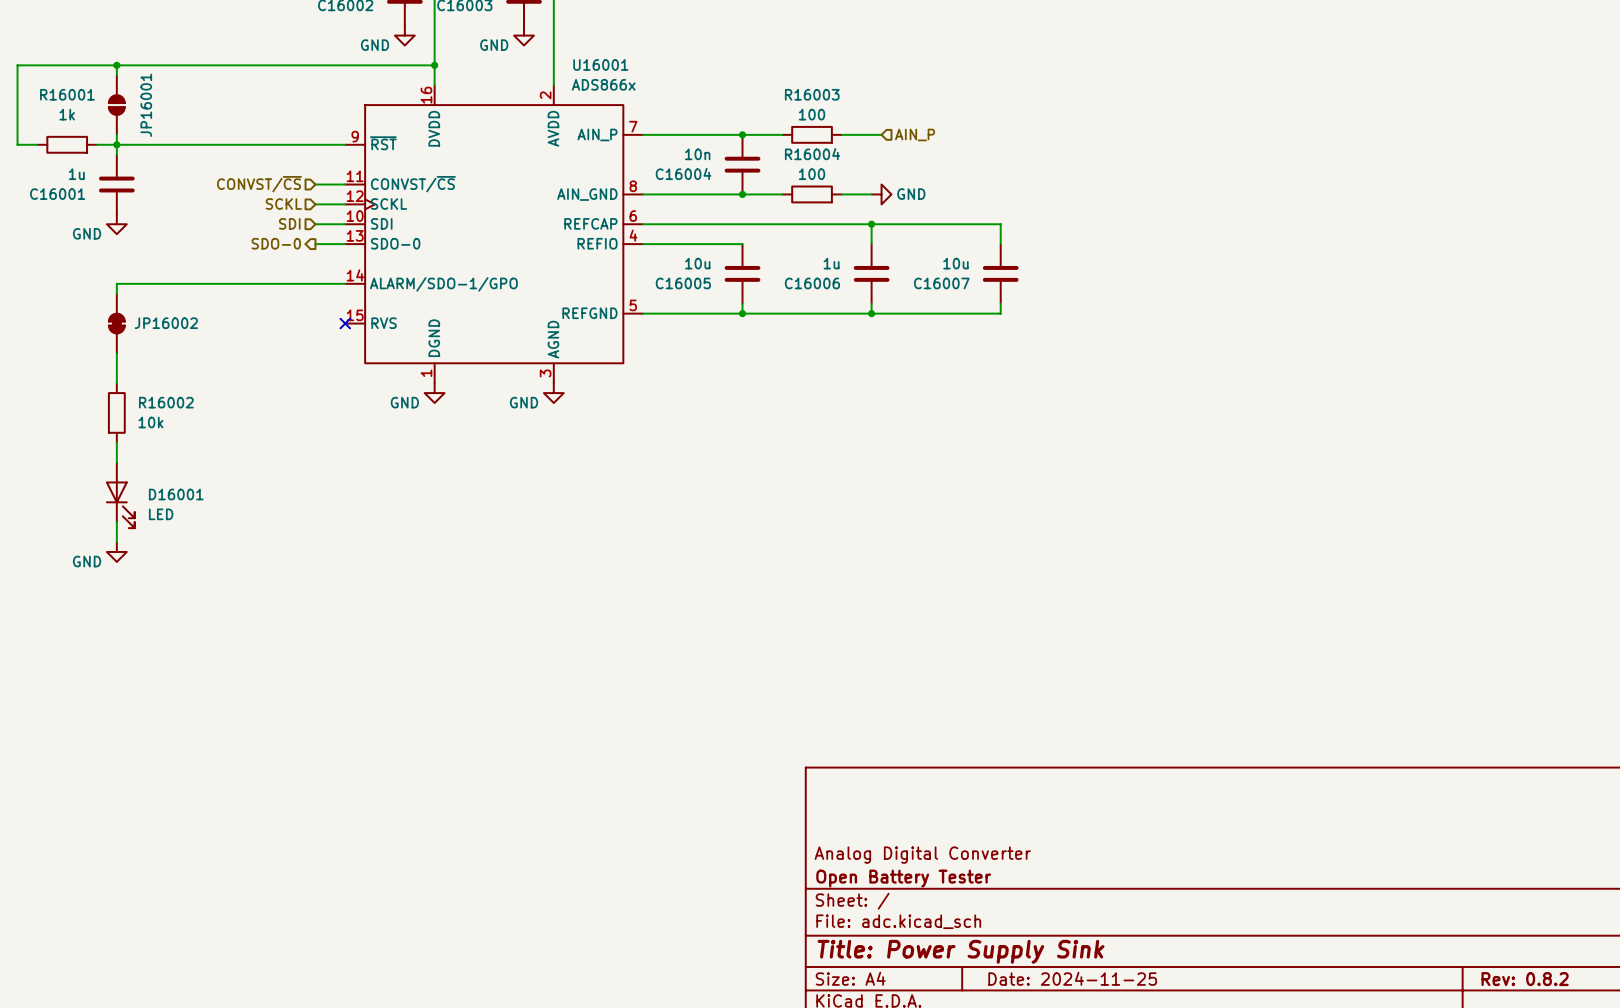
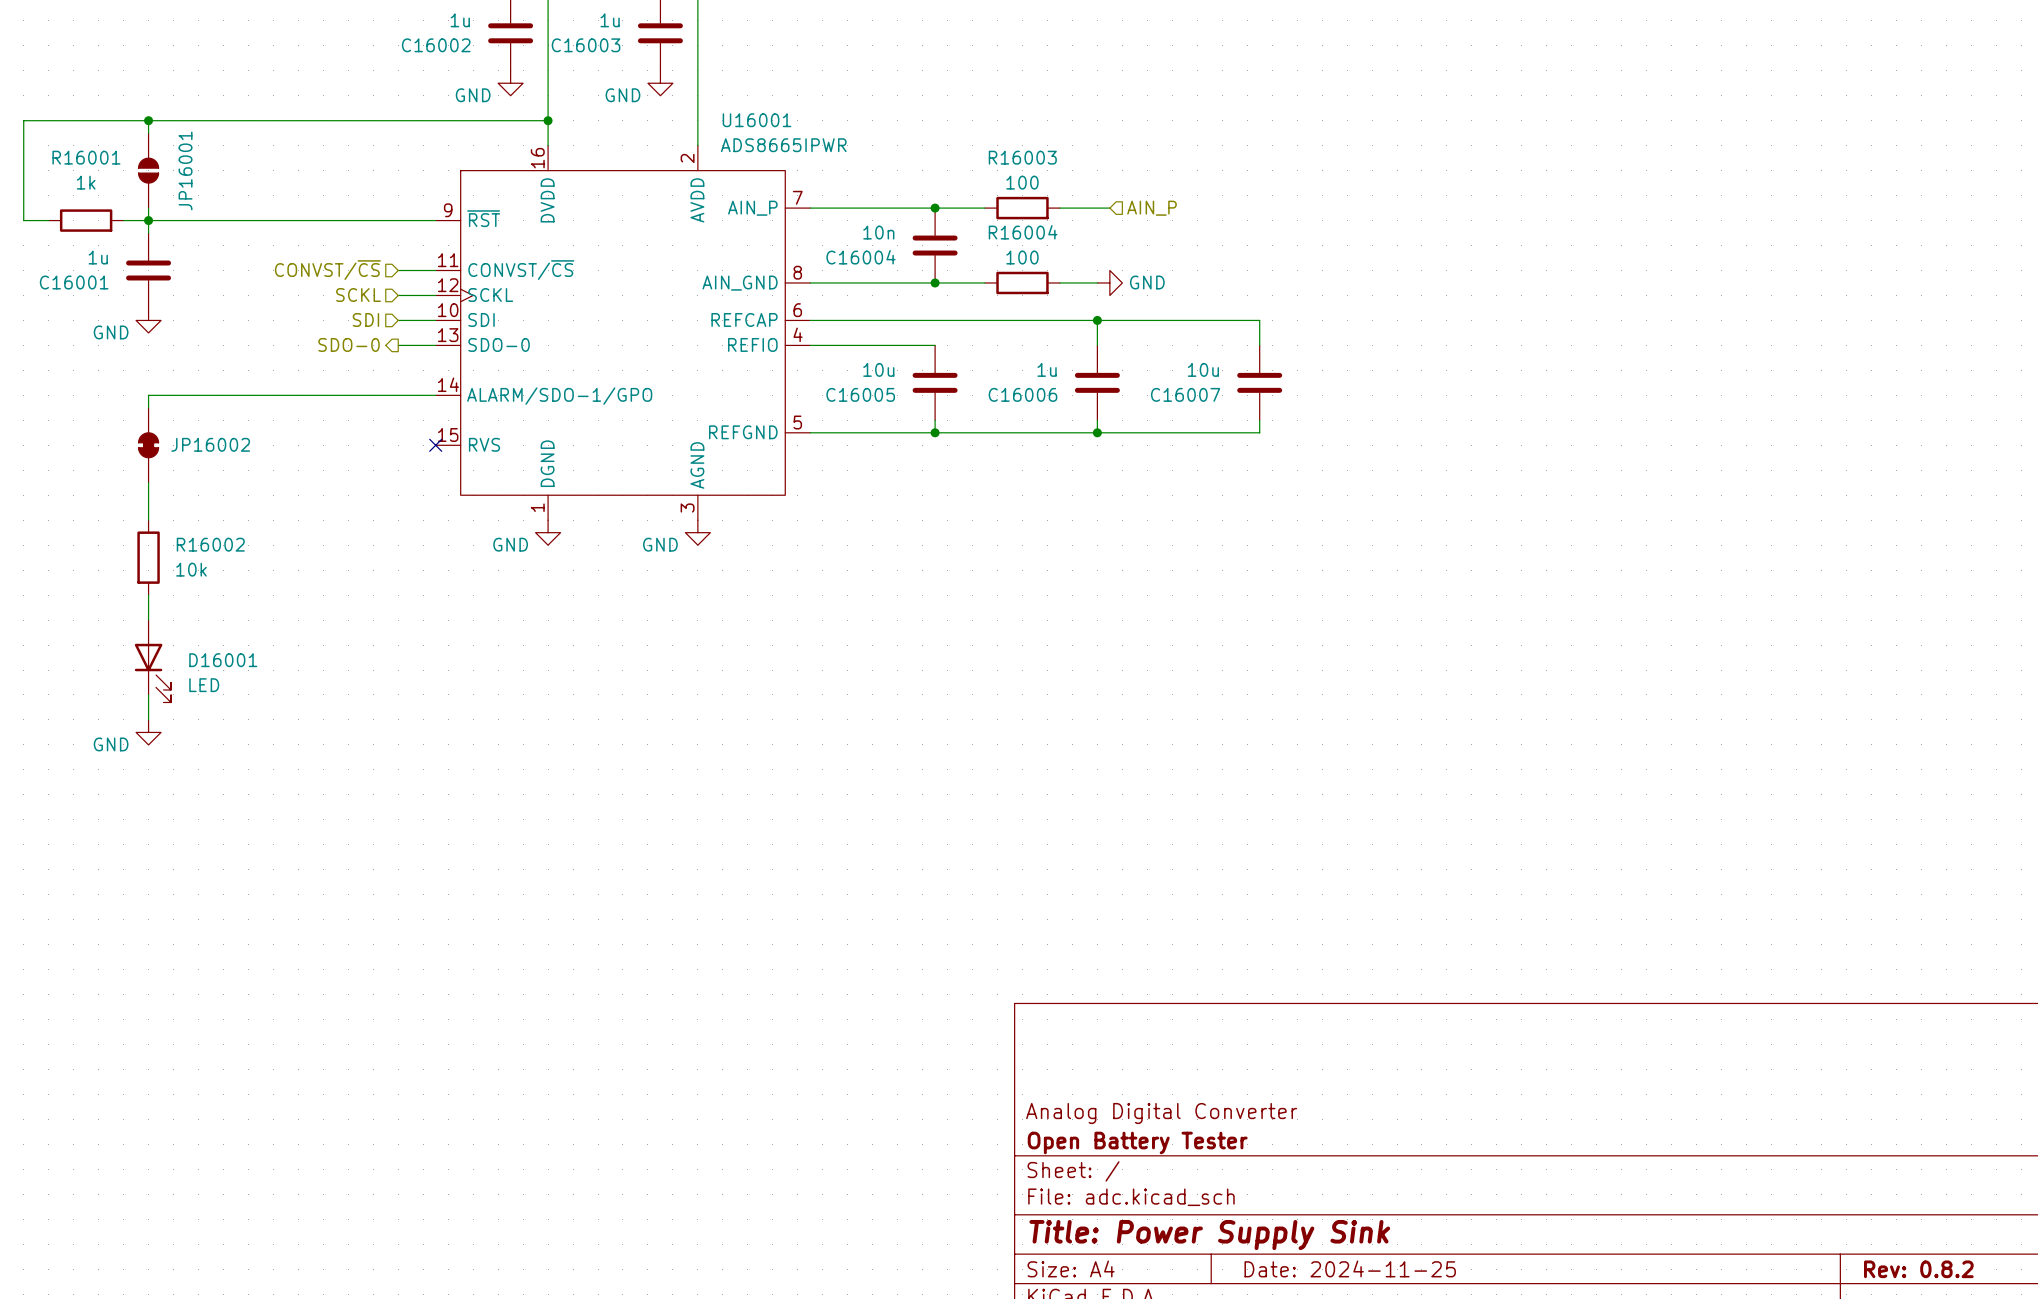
U16001 value: ADS866x (603, 84) -> ADS8665IPWR (783, 145)

